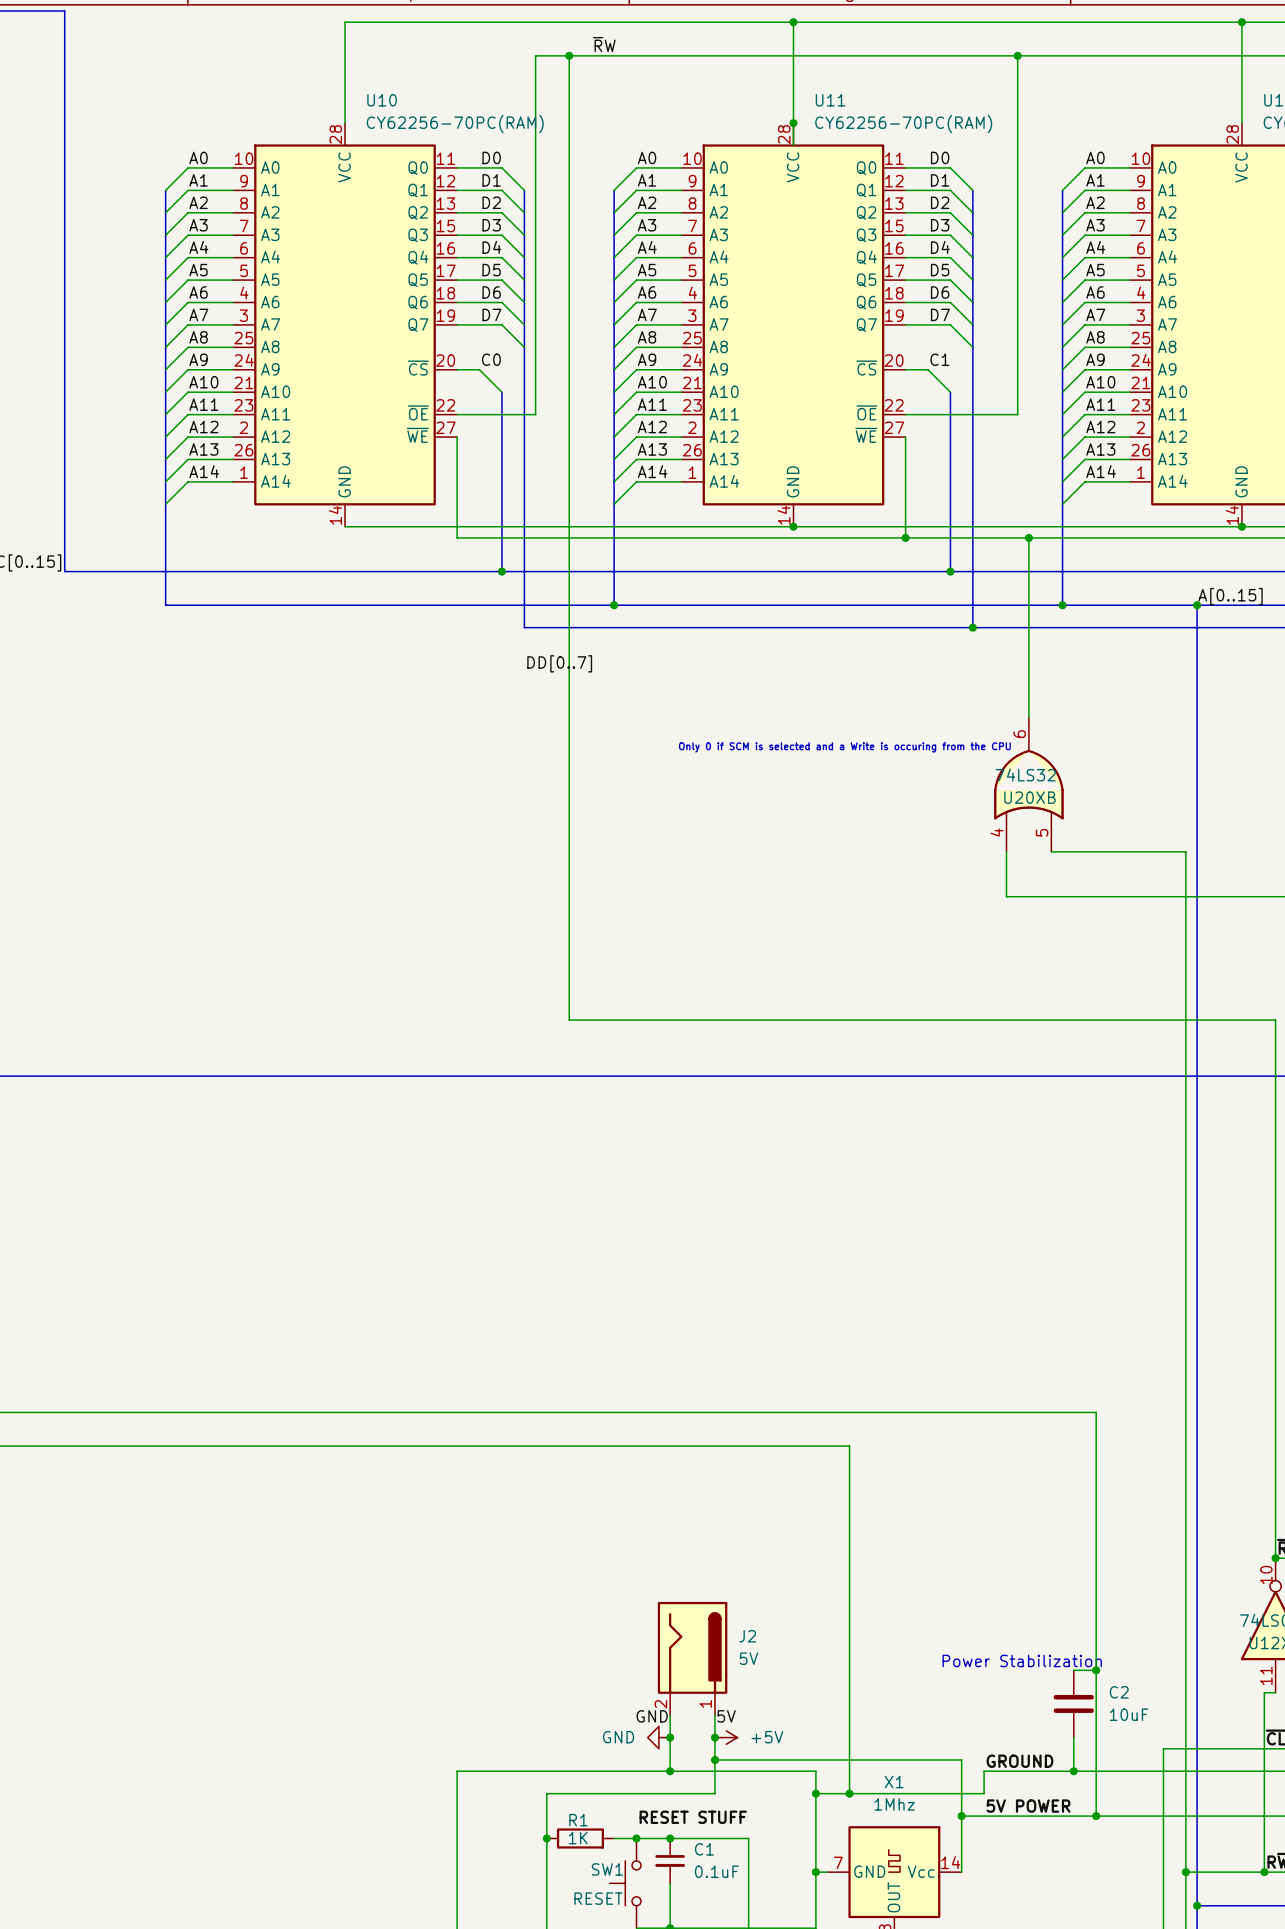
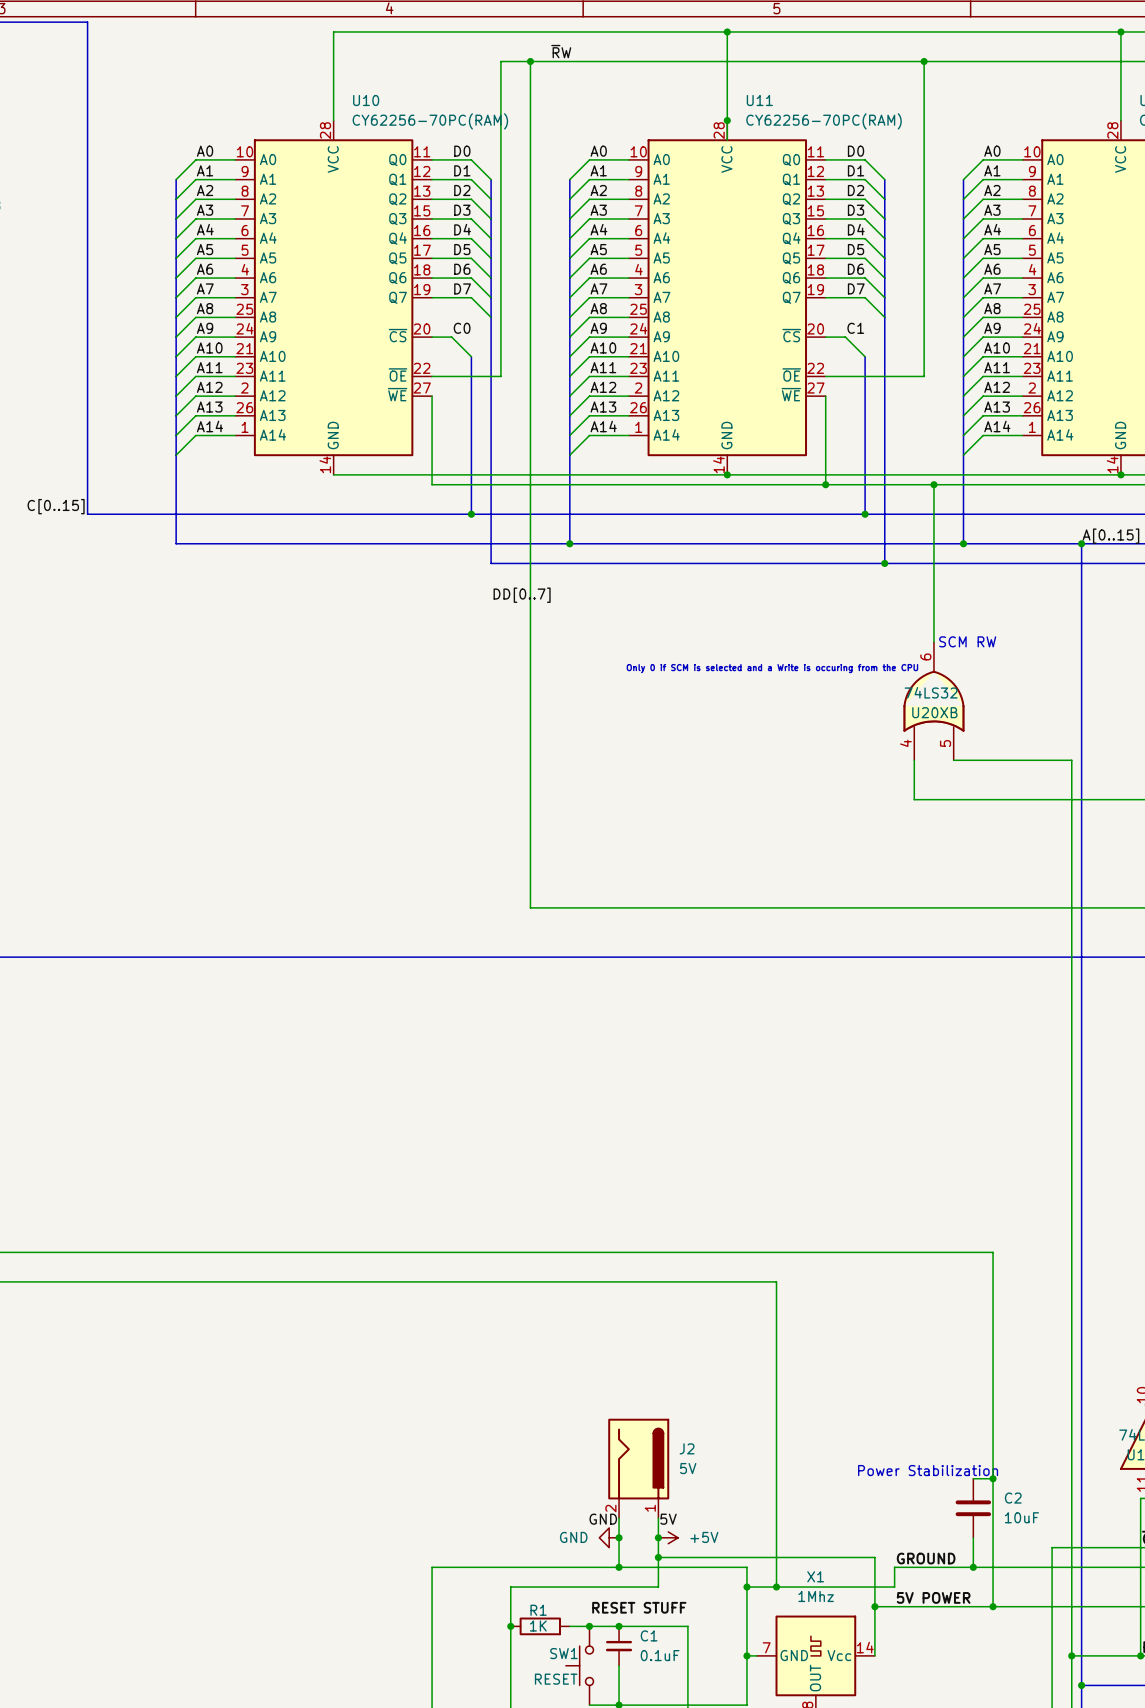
text: none -> SCM RW (967, 641)

